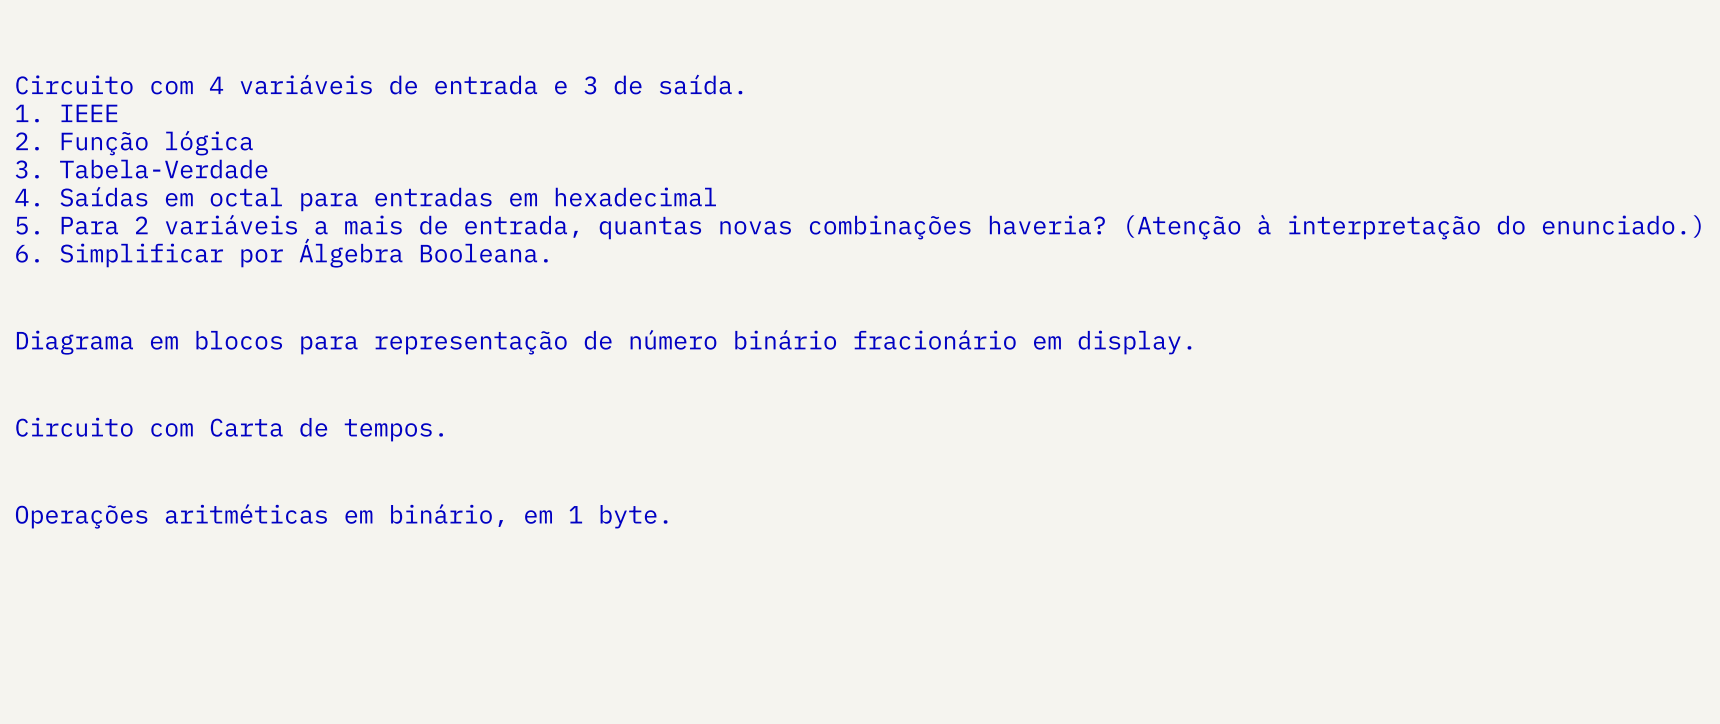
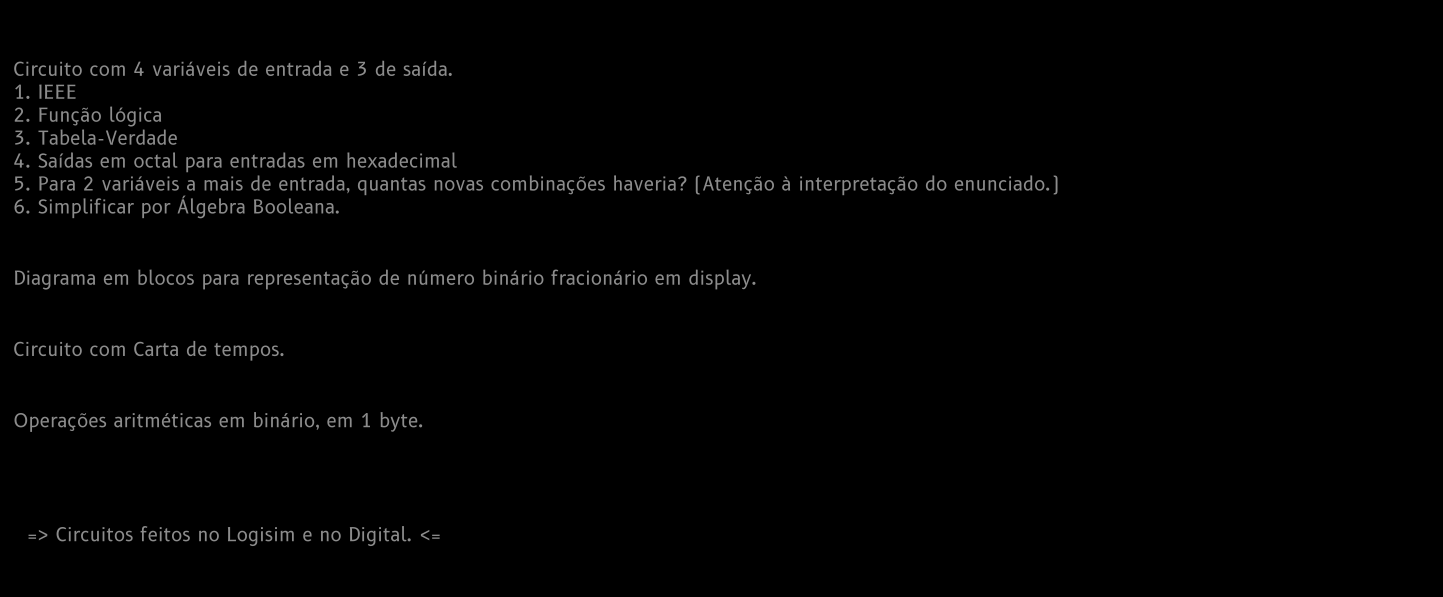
text: none -> => Circuitos feitos no Logisim e no Digital. <= (234, 536)

